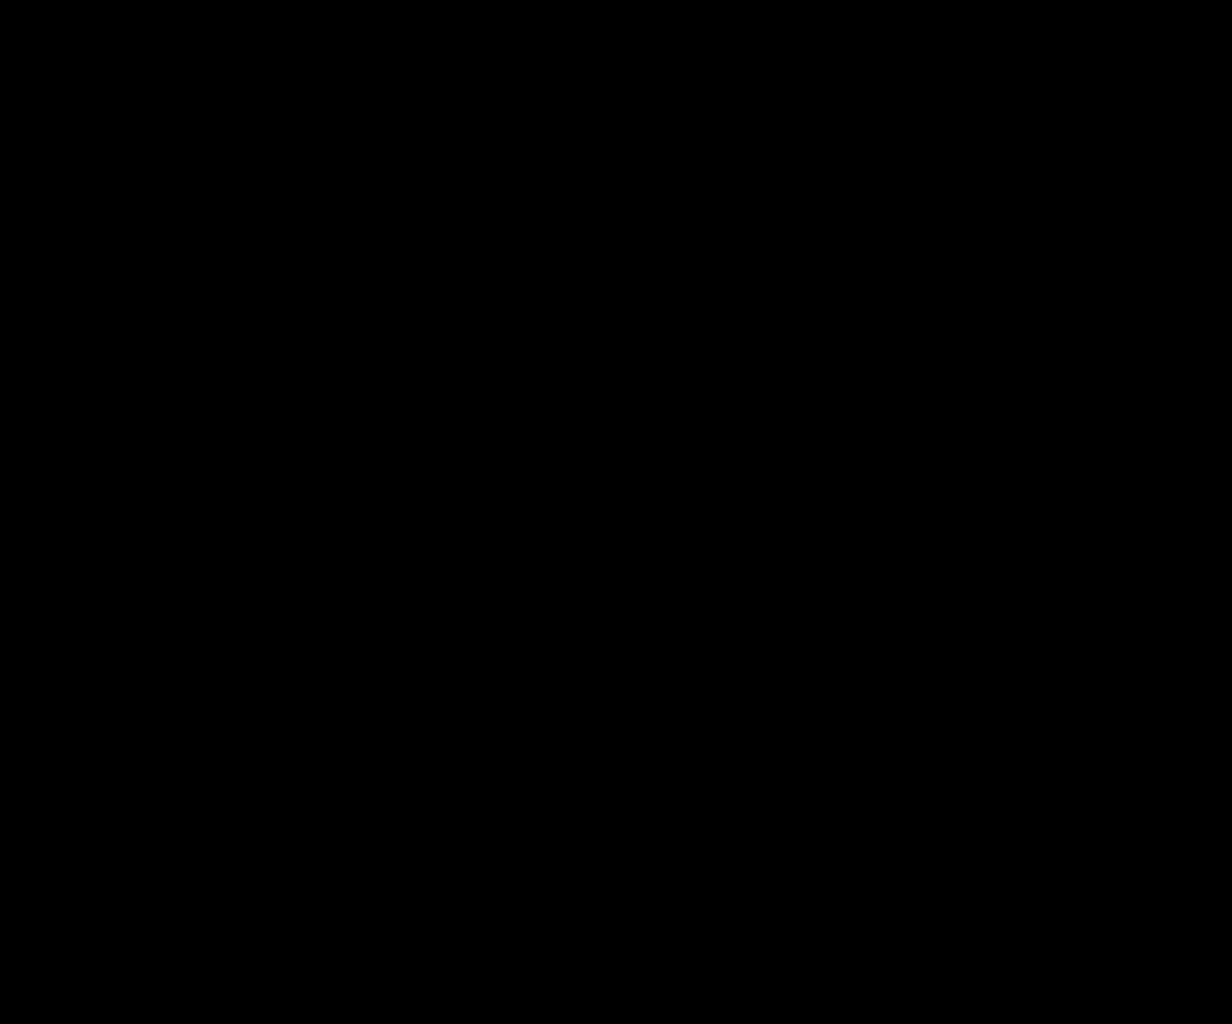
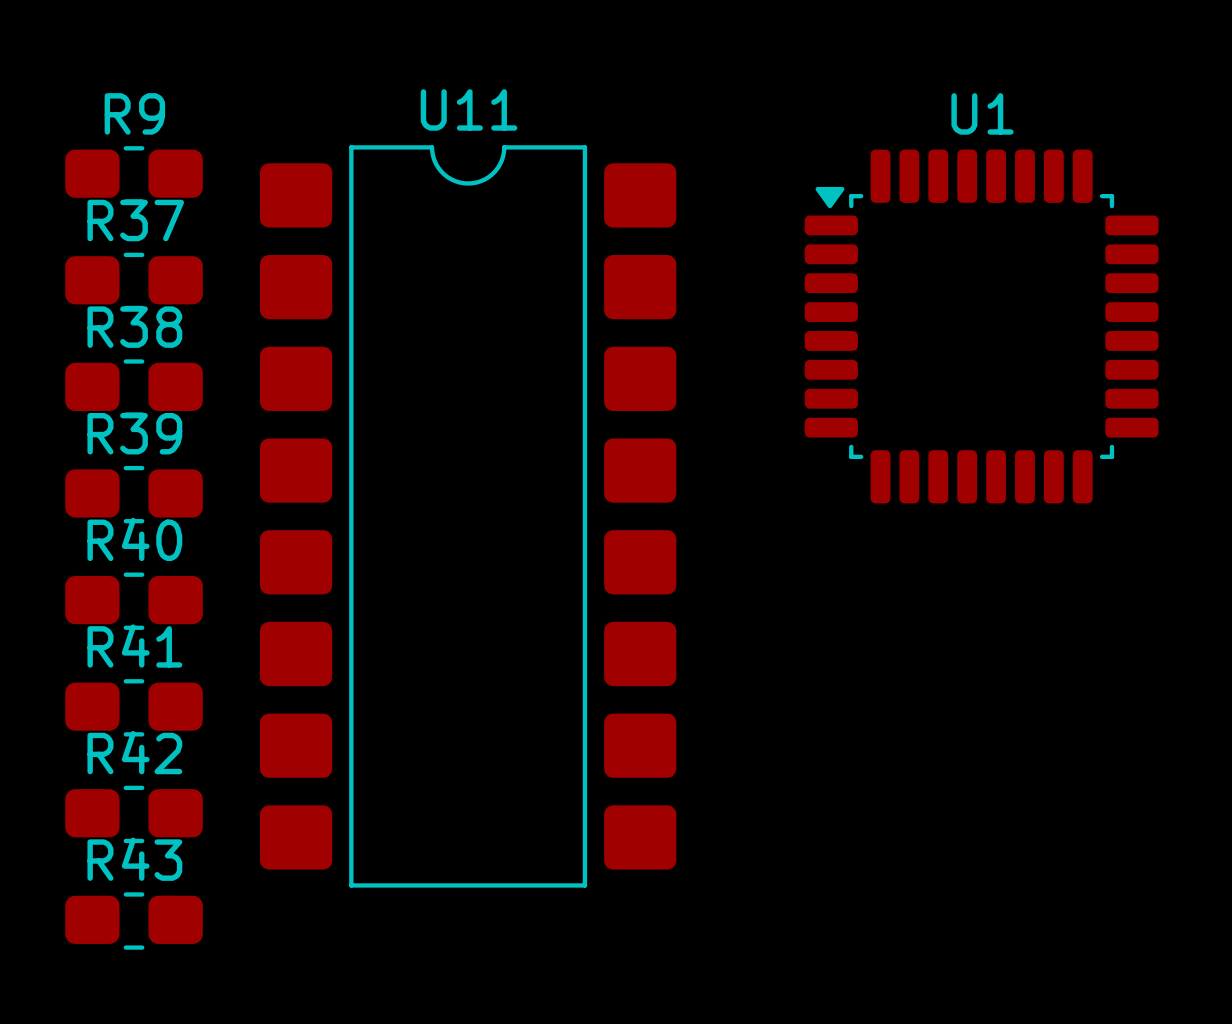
R9: none -> (134, 174)
R37: none -> (134, 281)
U1: none -> (981, 326)
R38: none -> (134, 388)
R39: none -> (134, 494)
U11: none -> (468, 516)
R40: none -> (134, 601)
R41: none -> (134, 707)
R42: none -> (134, 814)
R43: none -> (134, 921)

